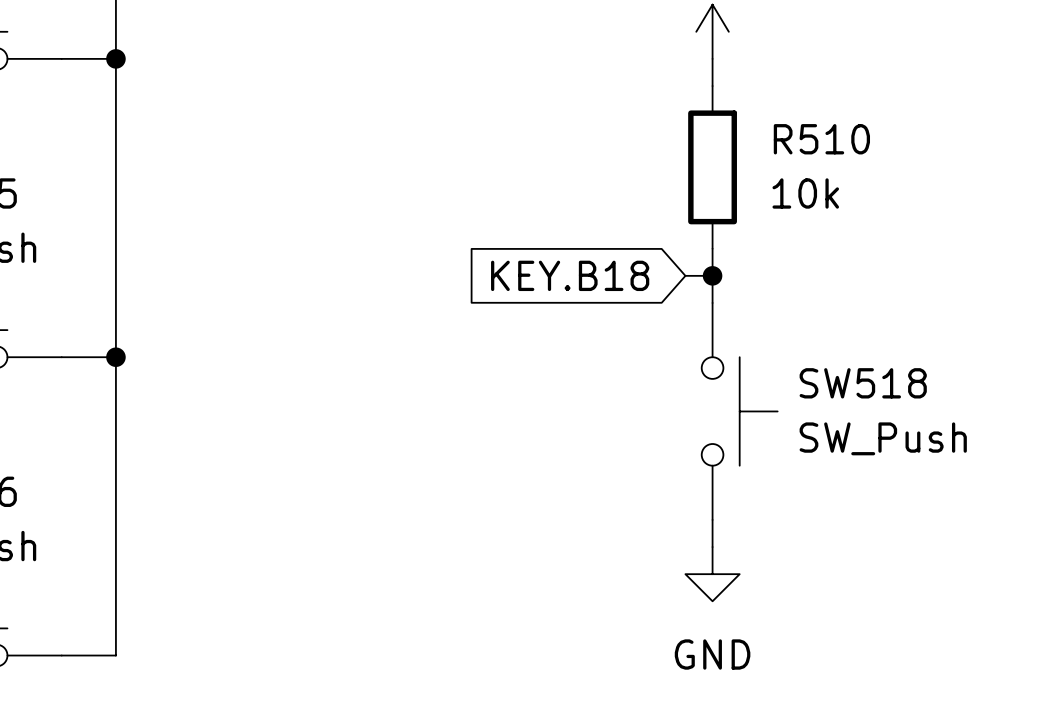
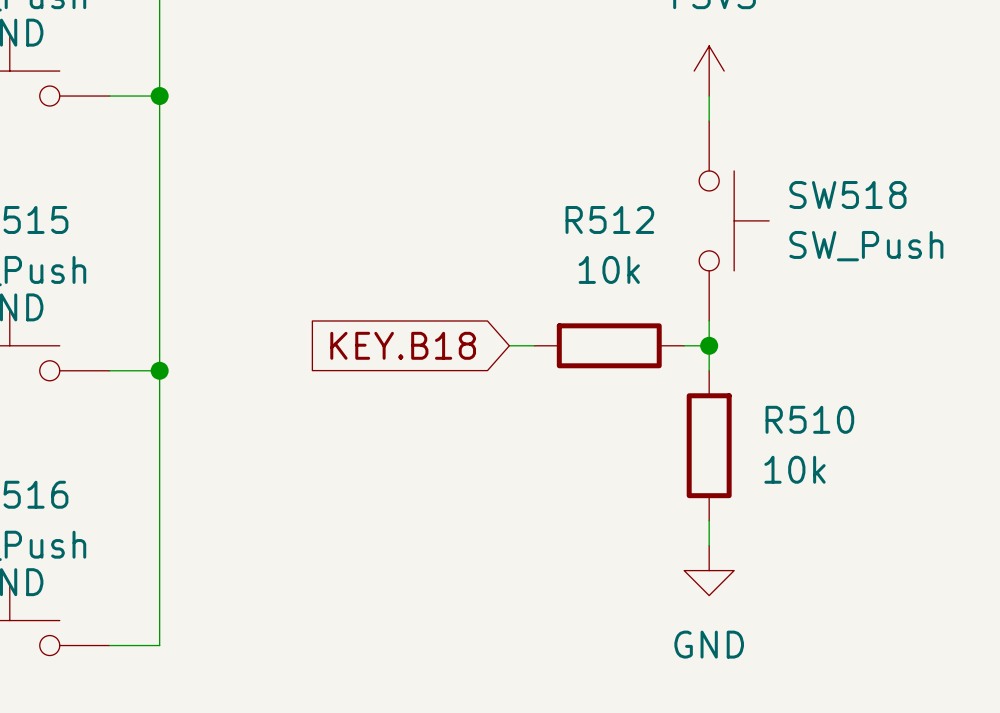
R510 position: (712, 167) -> (709, 445)
global label position: KEY.B18 (570, 275) -> KEY.B18 (403, 345)
wire: (685, 275) (712, 275) -> (684, 345) (709, 345)
junction position: (712, 275) -> (709, 345)
wire: none -> (509, 345) (534, 345)
R512: none -> 10k (609, 345)
SW518 position: (739, 411) -> (734, 220)

